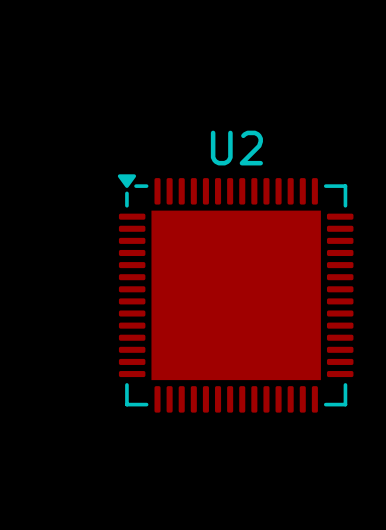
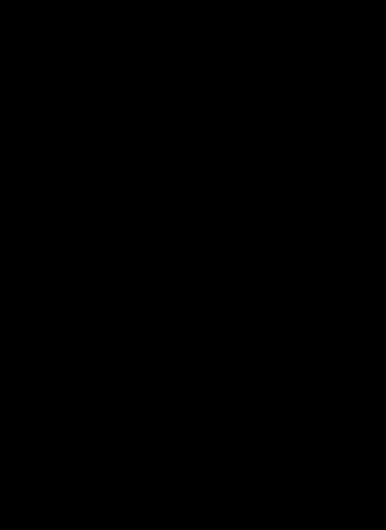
U2: (235, 293) -> none

